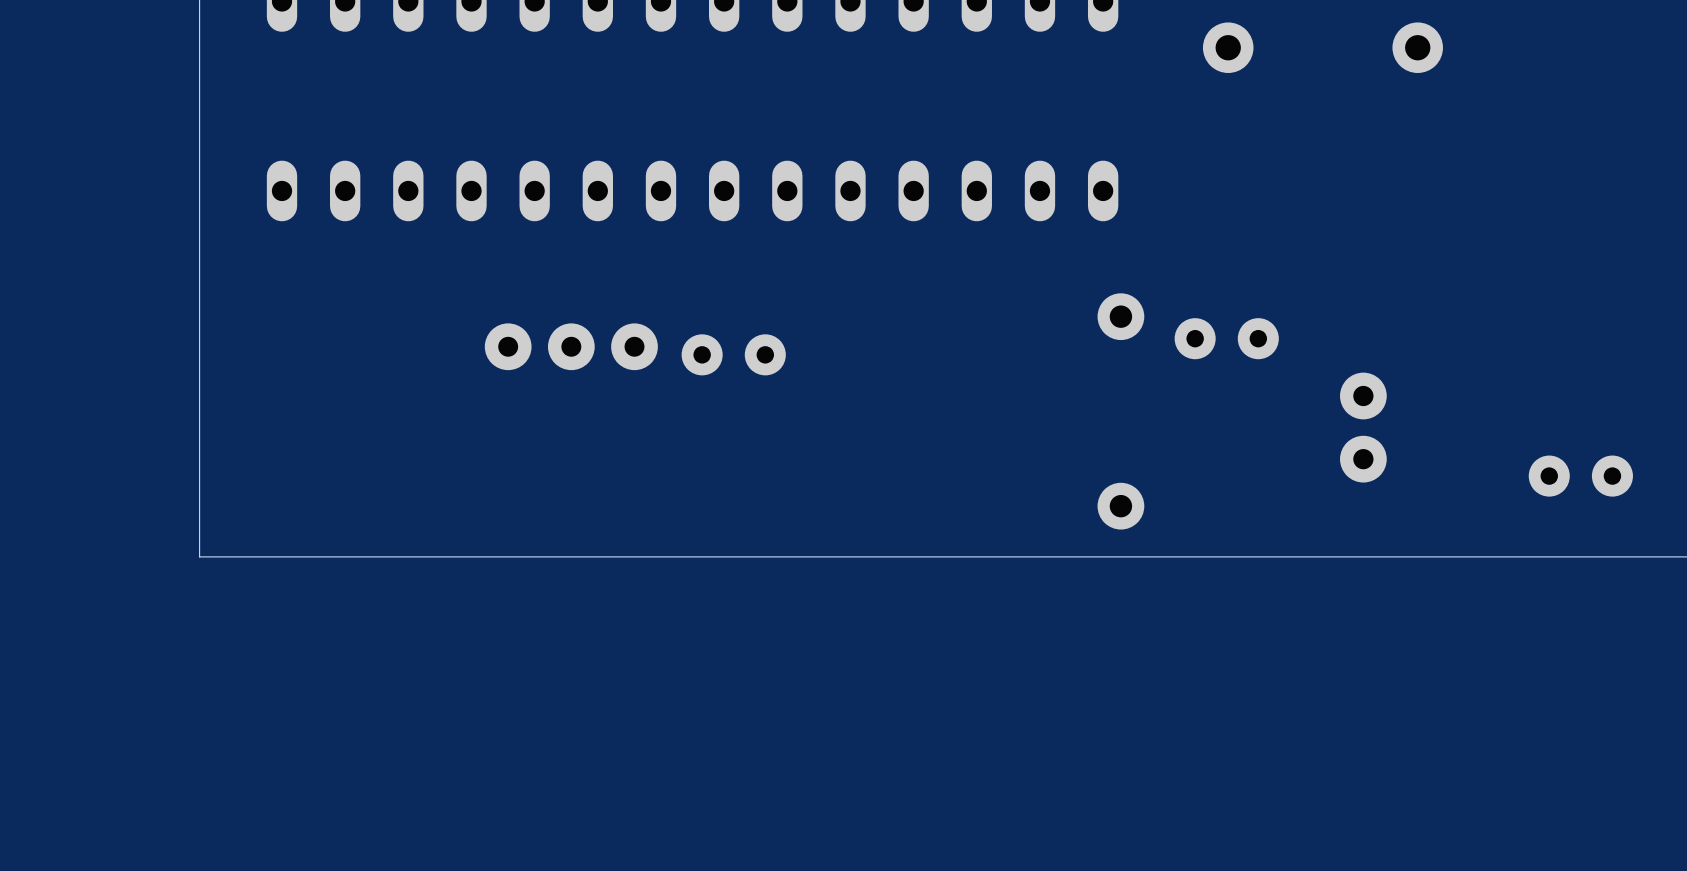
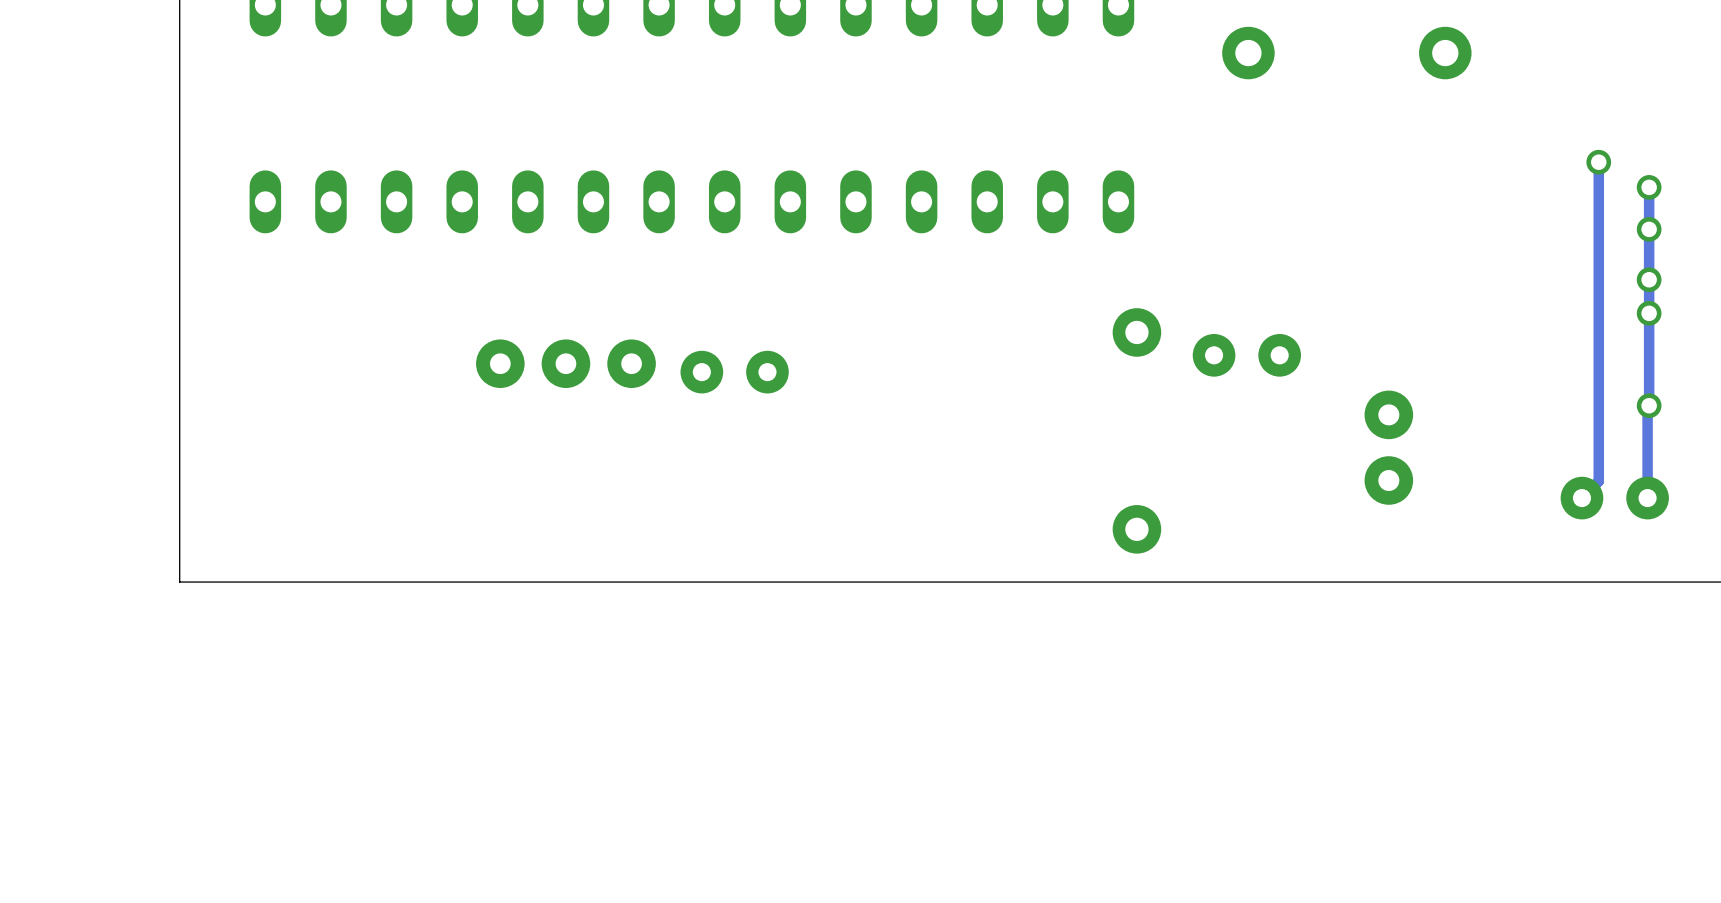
track: none -> (1598, 162) (1598, 481) (1581, 498)
via: none -> (1598, 162)
track: none -> (1649, 187) (1647, 498)
via: none -> (1649, 187)
via: none -> (1649, 229)
via: none -> (1649, 279)
via: none -> (1649, 313)
via: none -> (1649, 405)

